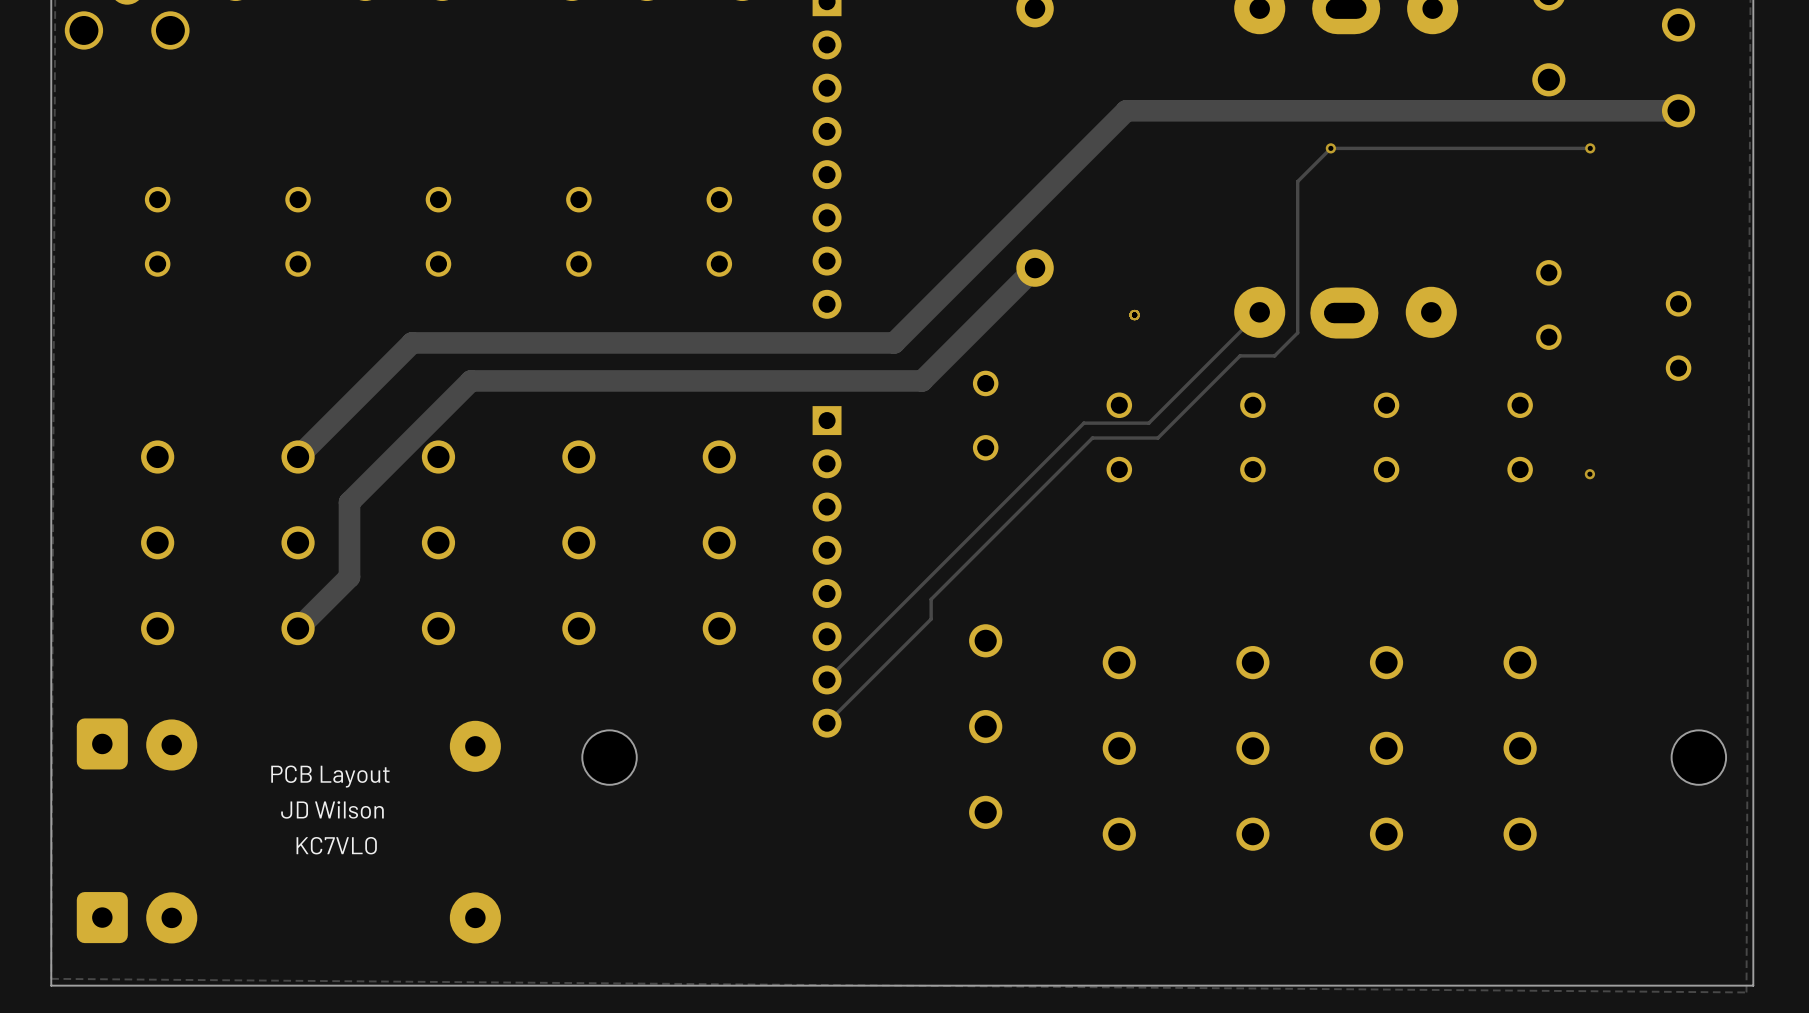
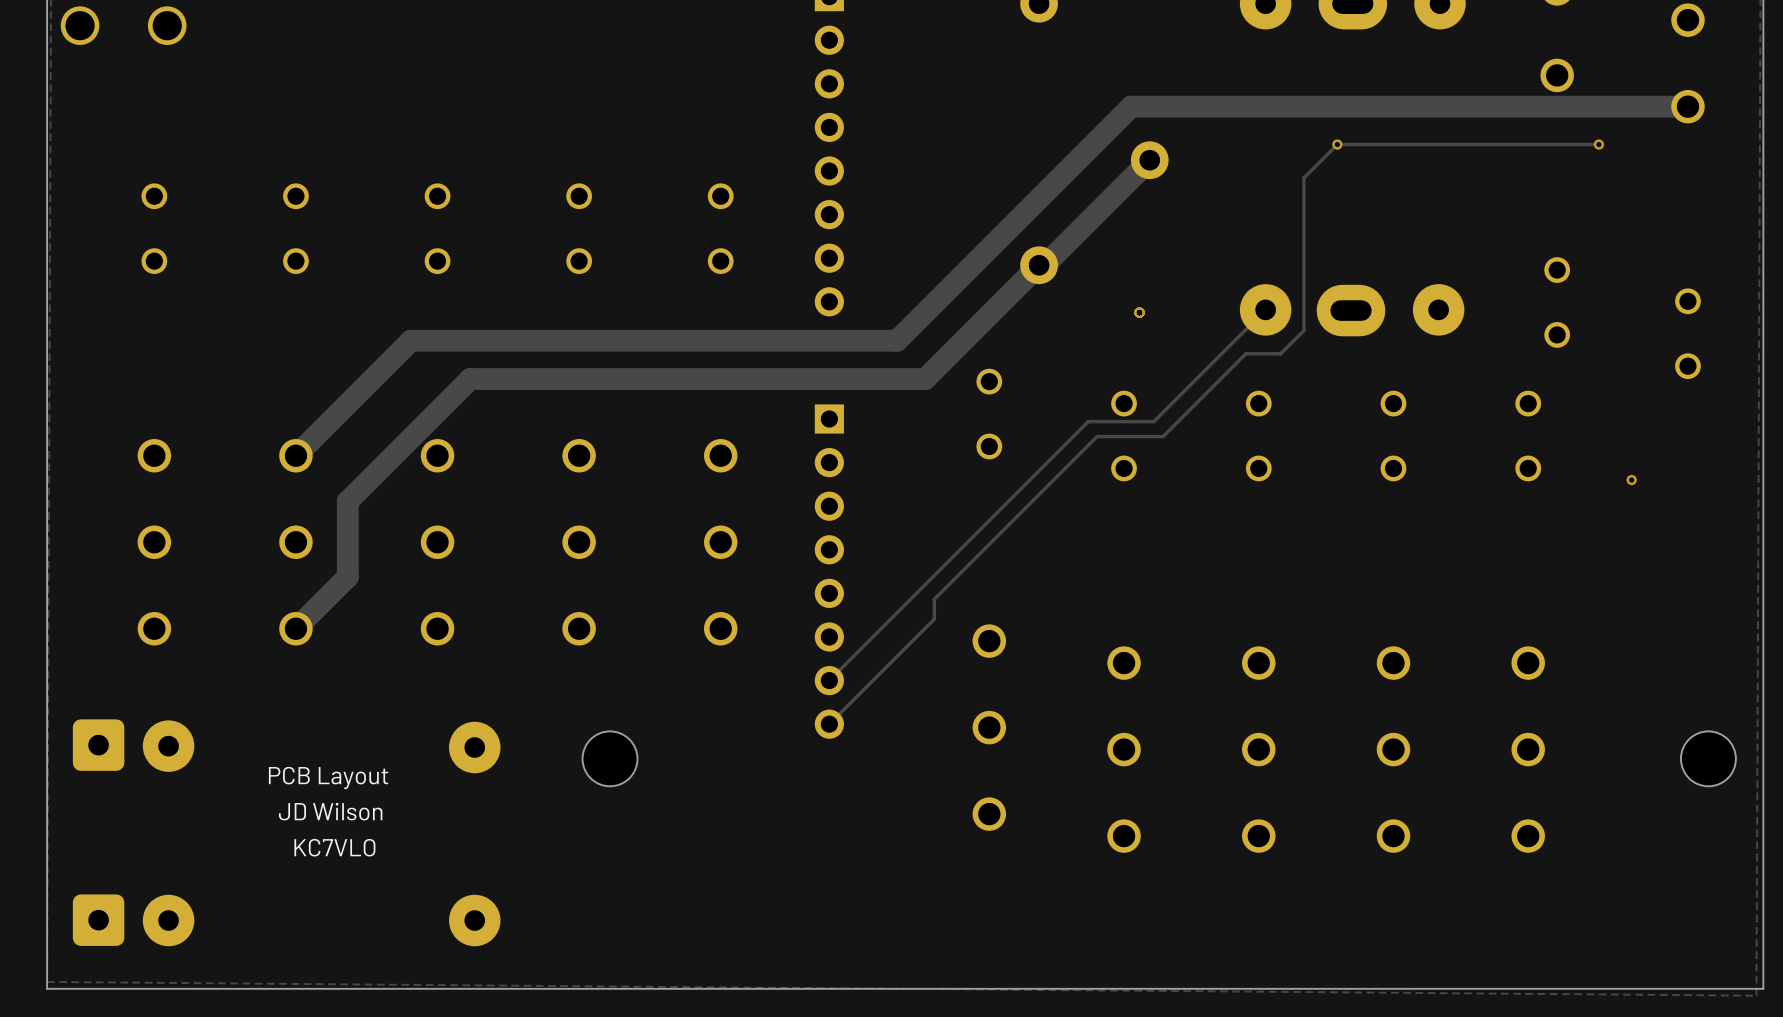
track: none -> (1149, 160) (1044, 265) (1039, 265)
part: none -> (1149, 160)
via position: (1589, 474) -> (1631, 480)

